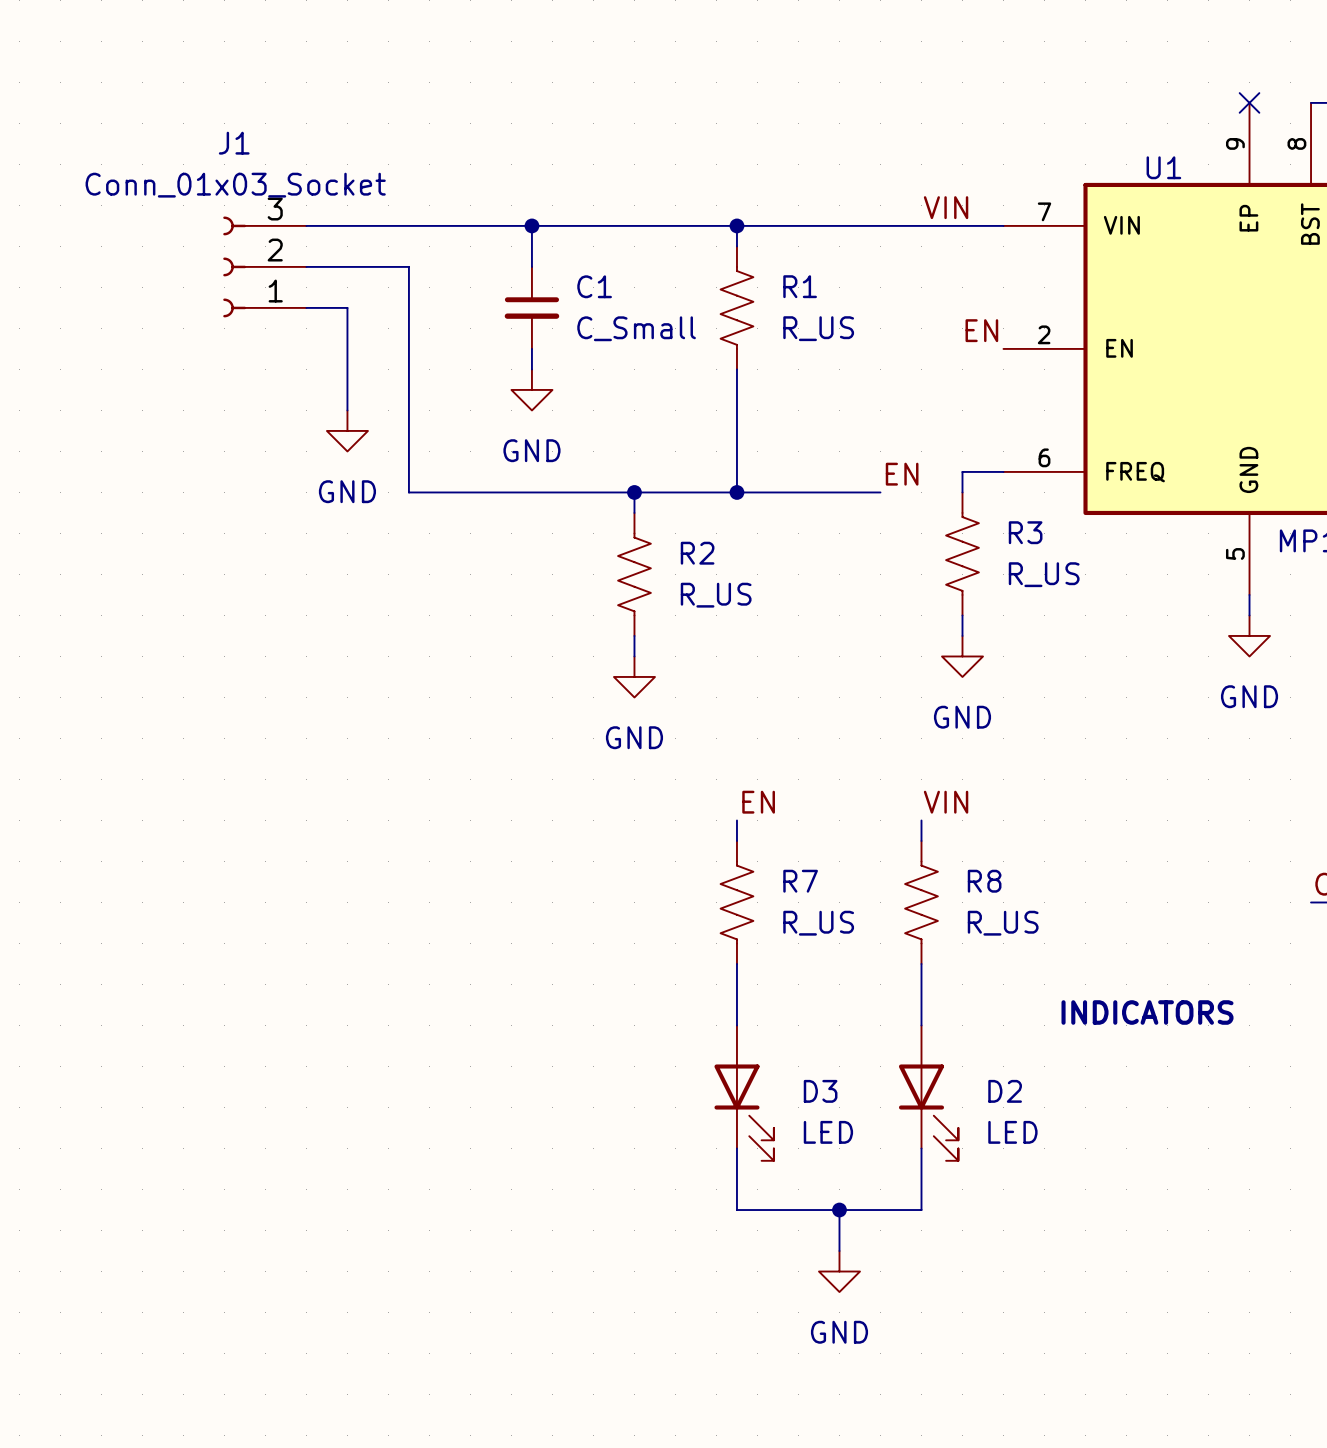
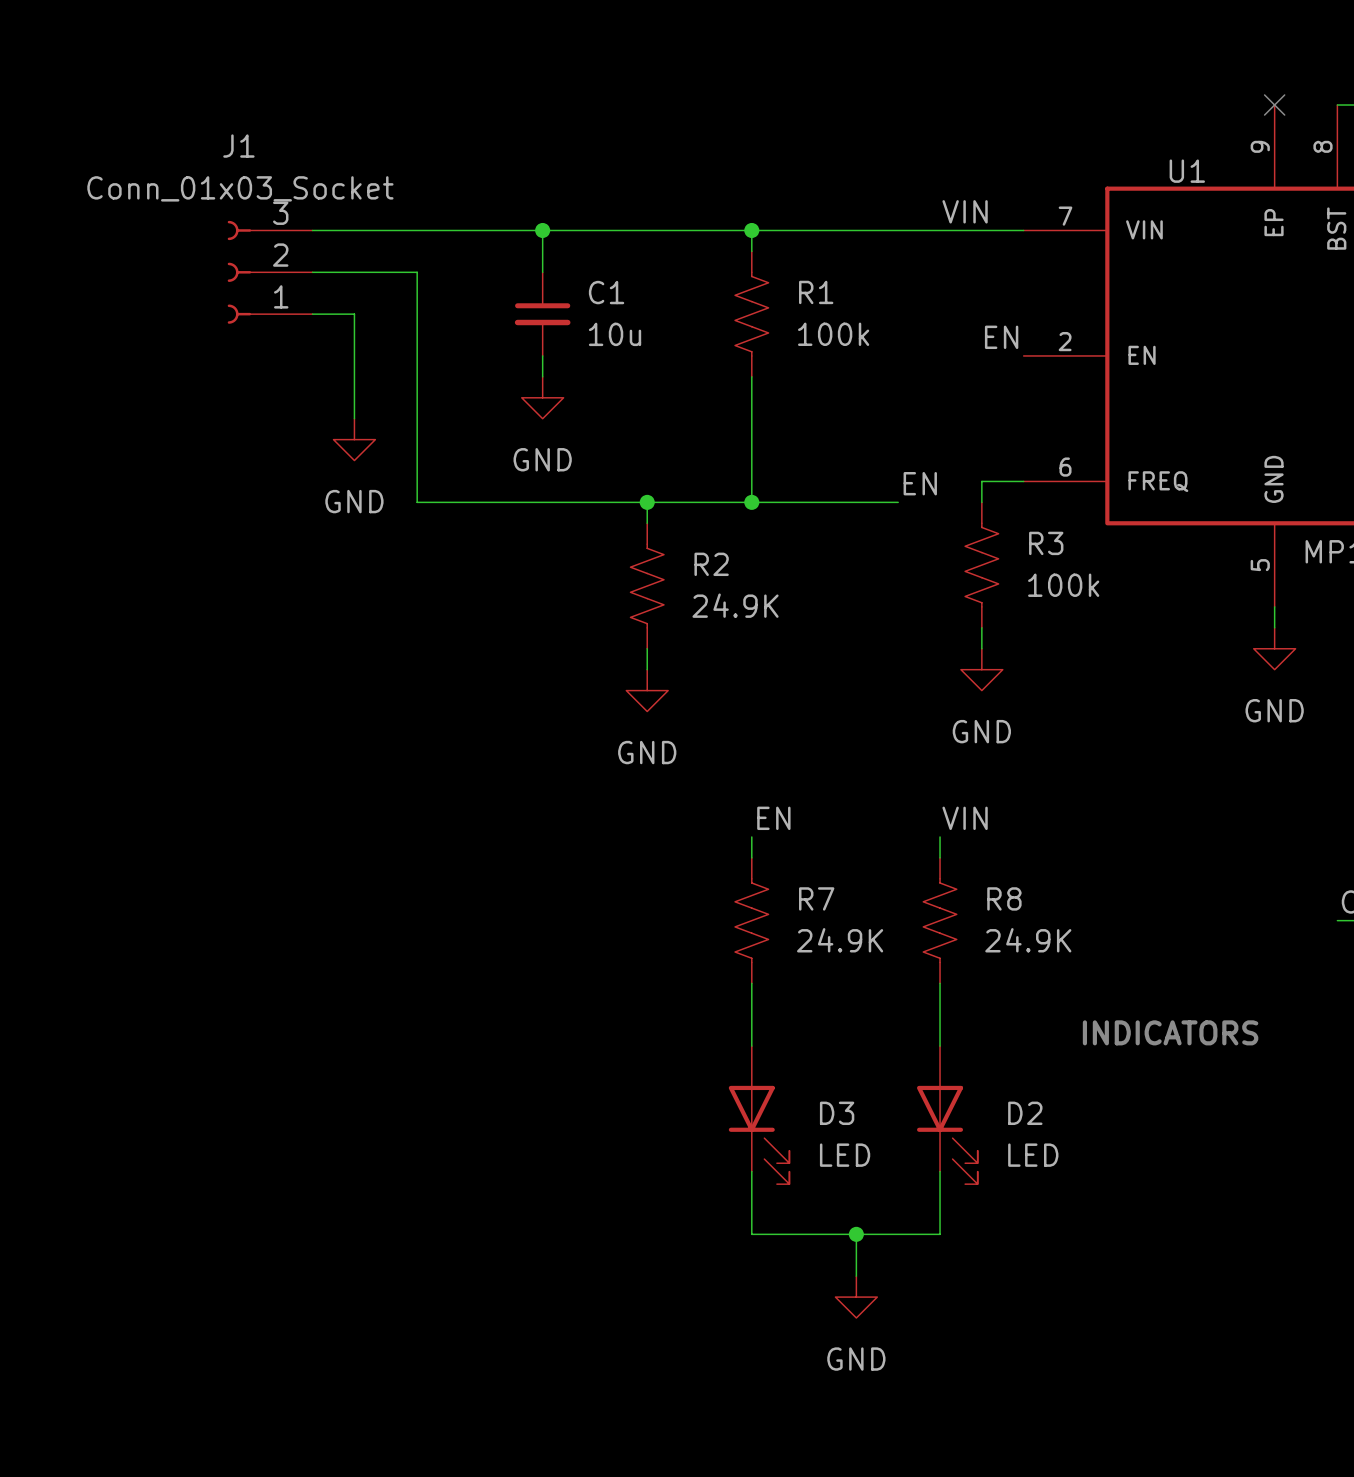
C1 value: C_Small (636, 328) -> 10u (615, 334)
R1 value: R_US (818, 328) -> 100k (833, 334)
R3 value: R_US (1044, 574) -> 100k (1063, 585)
R2 value: R_US (716, 595) -> 24.9K (735, 605)
R7 value: R_US (818, 923) -> 24.9K (840, 940)
R8 value: R_US (1003, 923) -> 24.9K (1028, 940)

